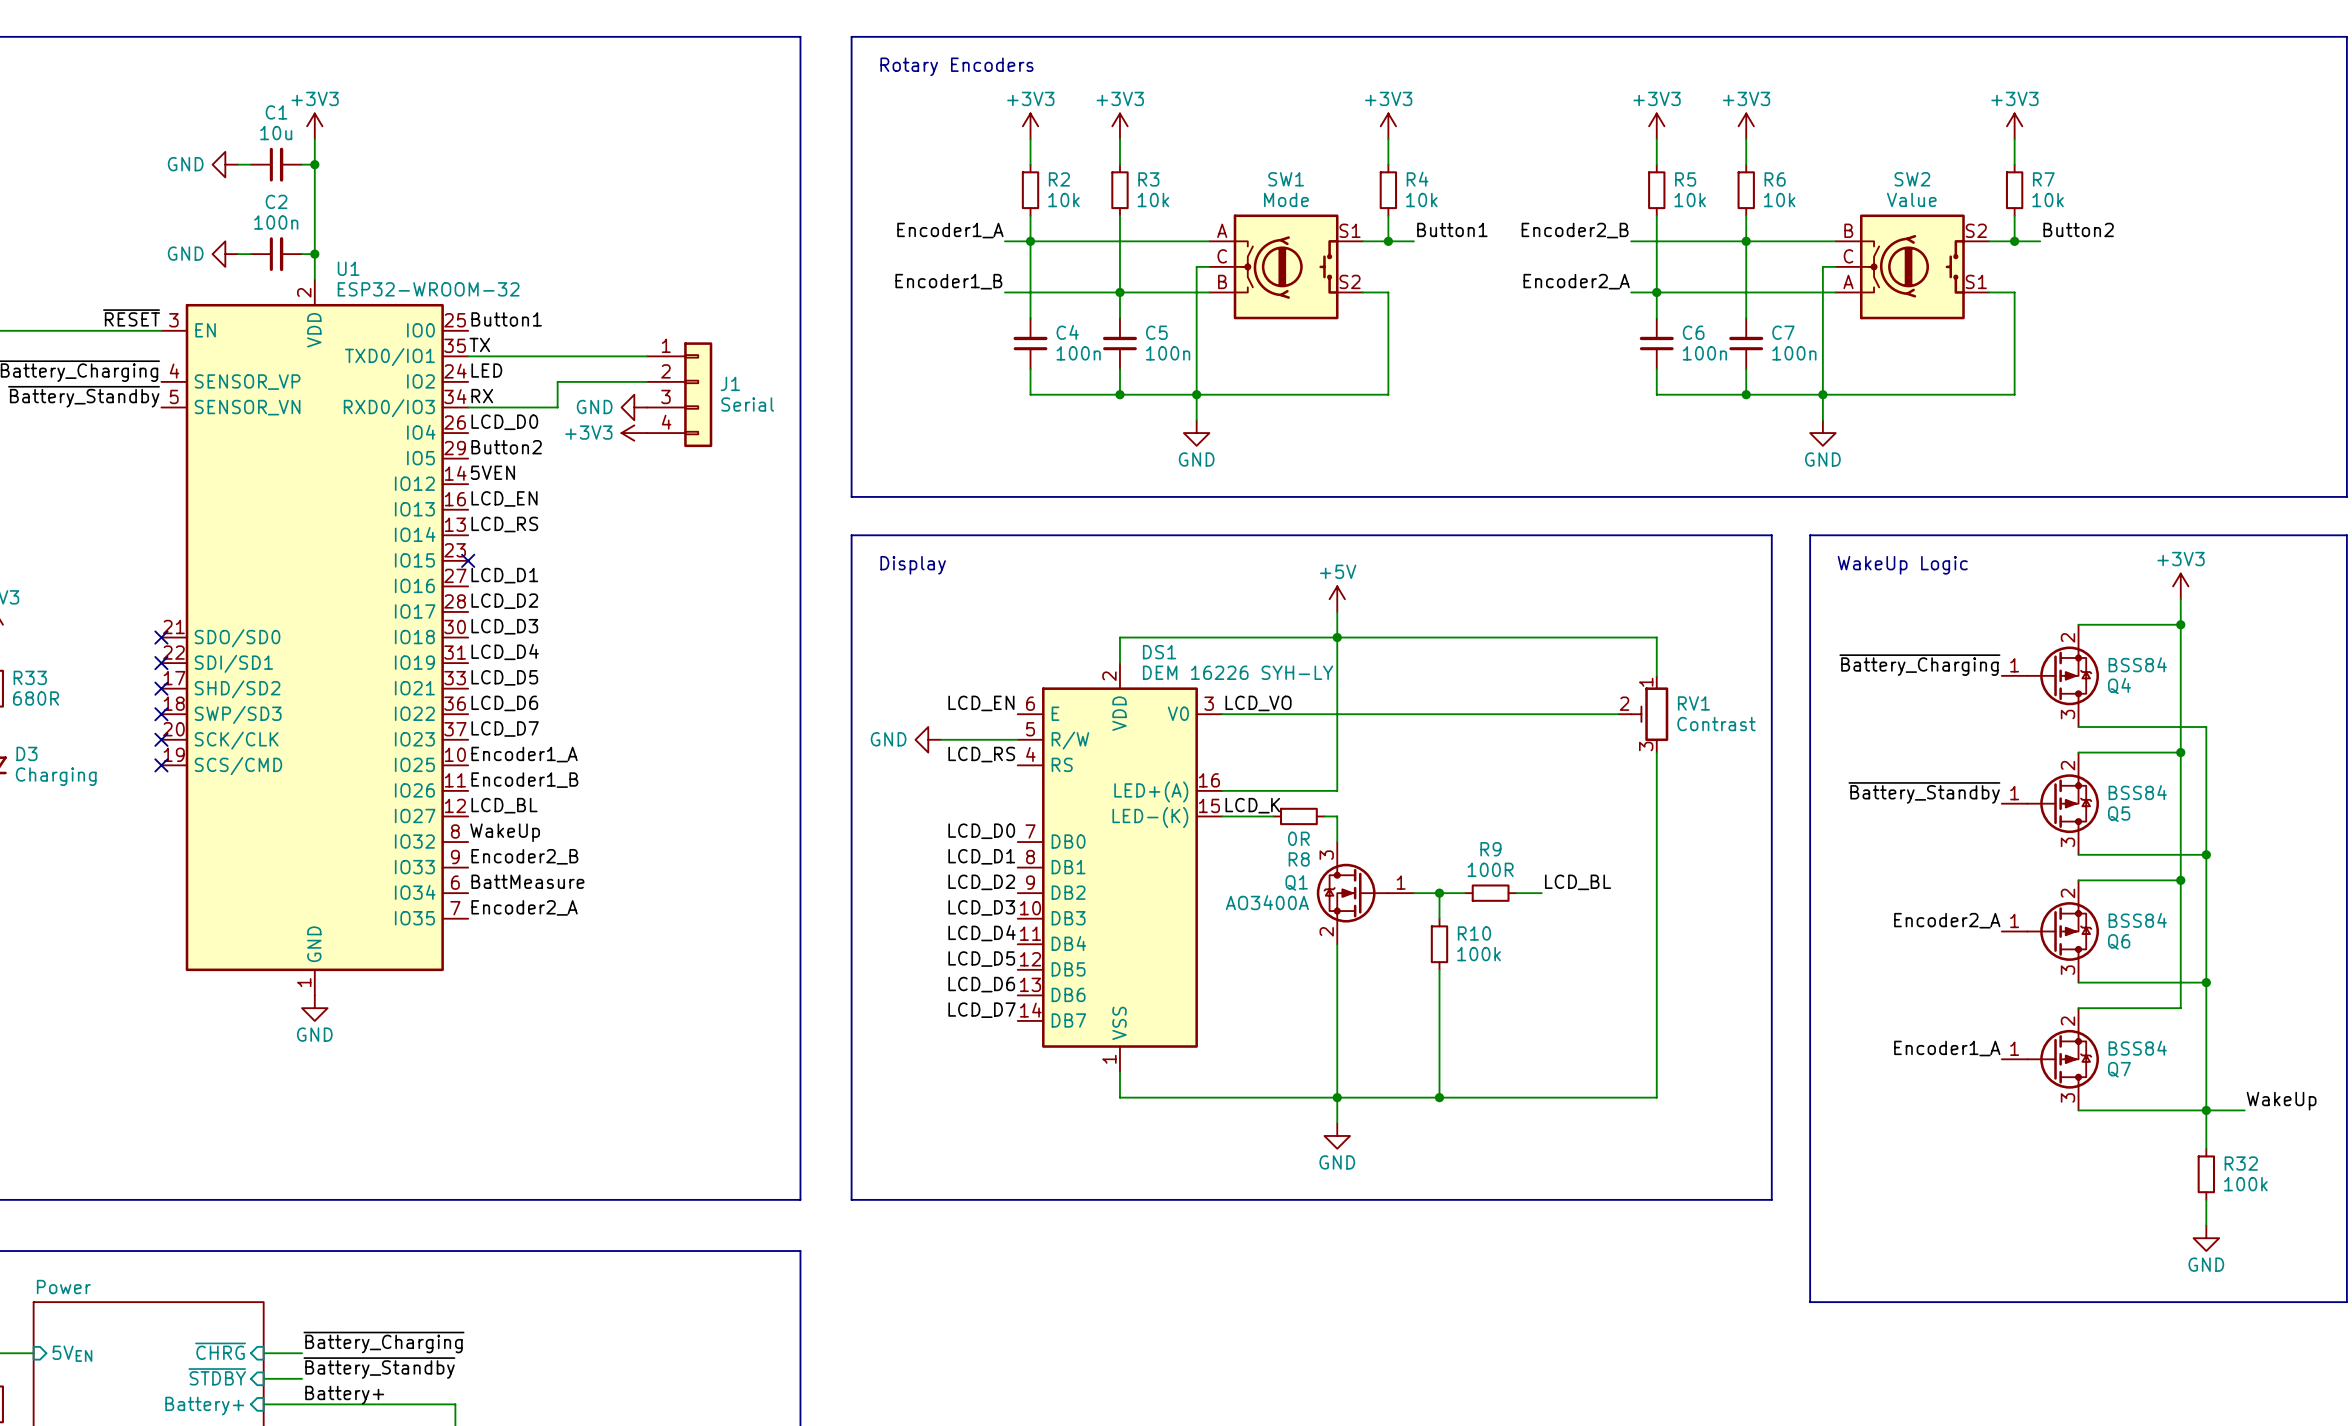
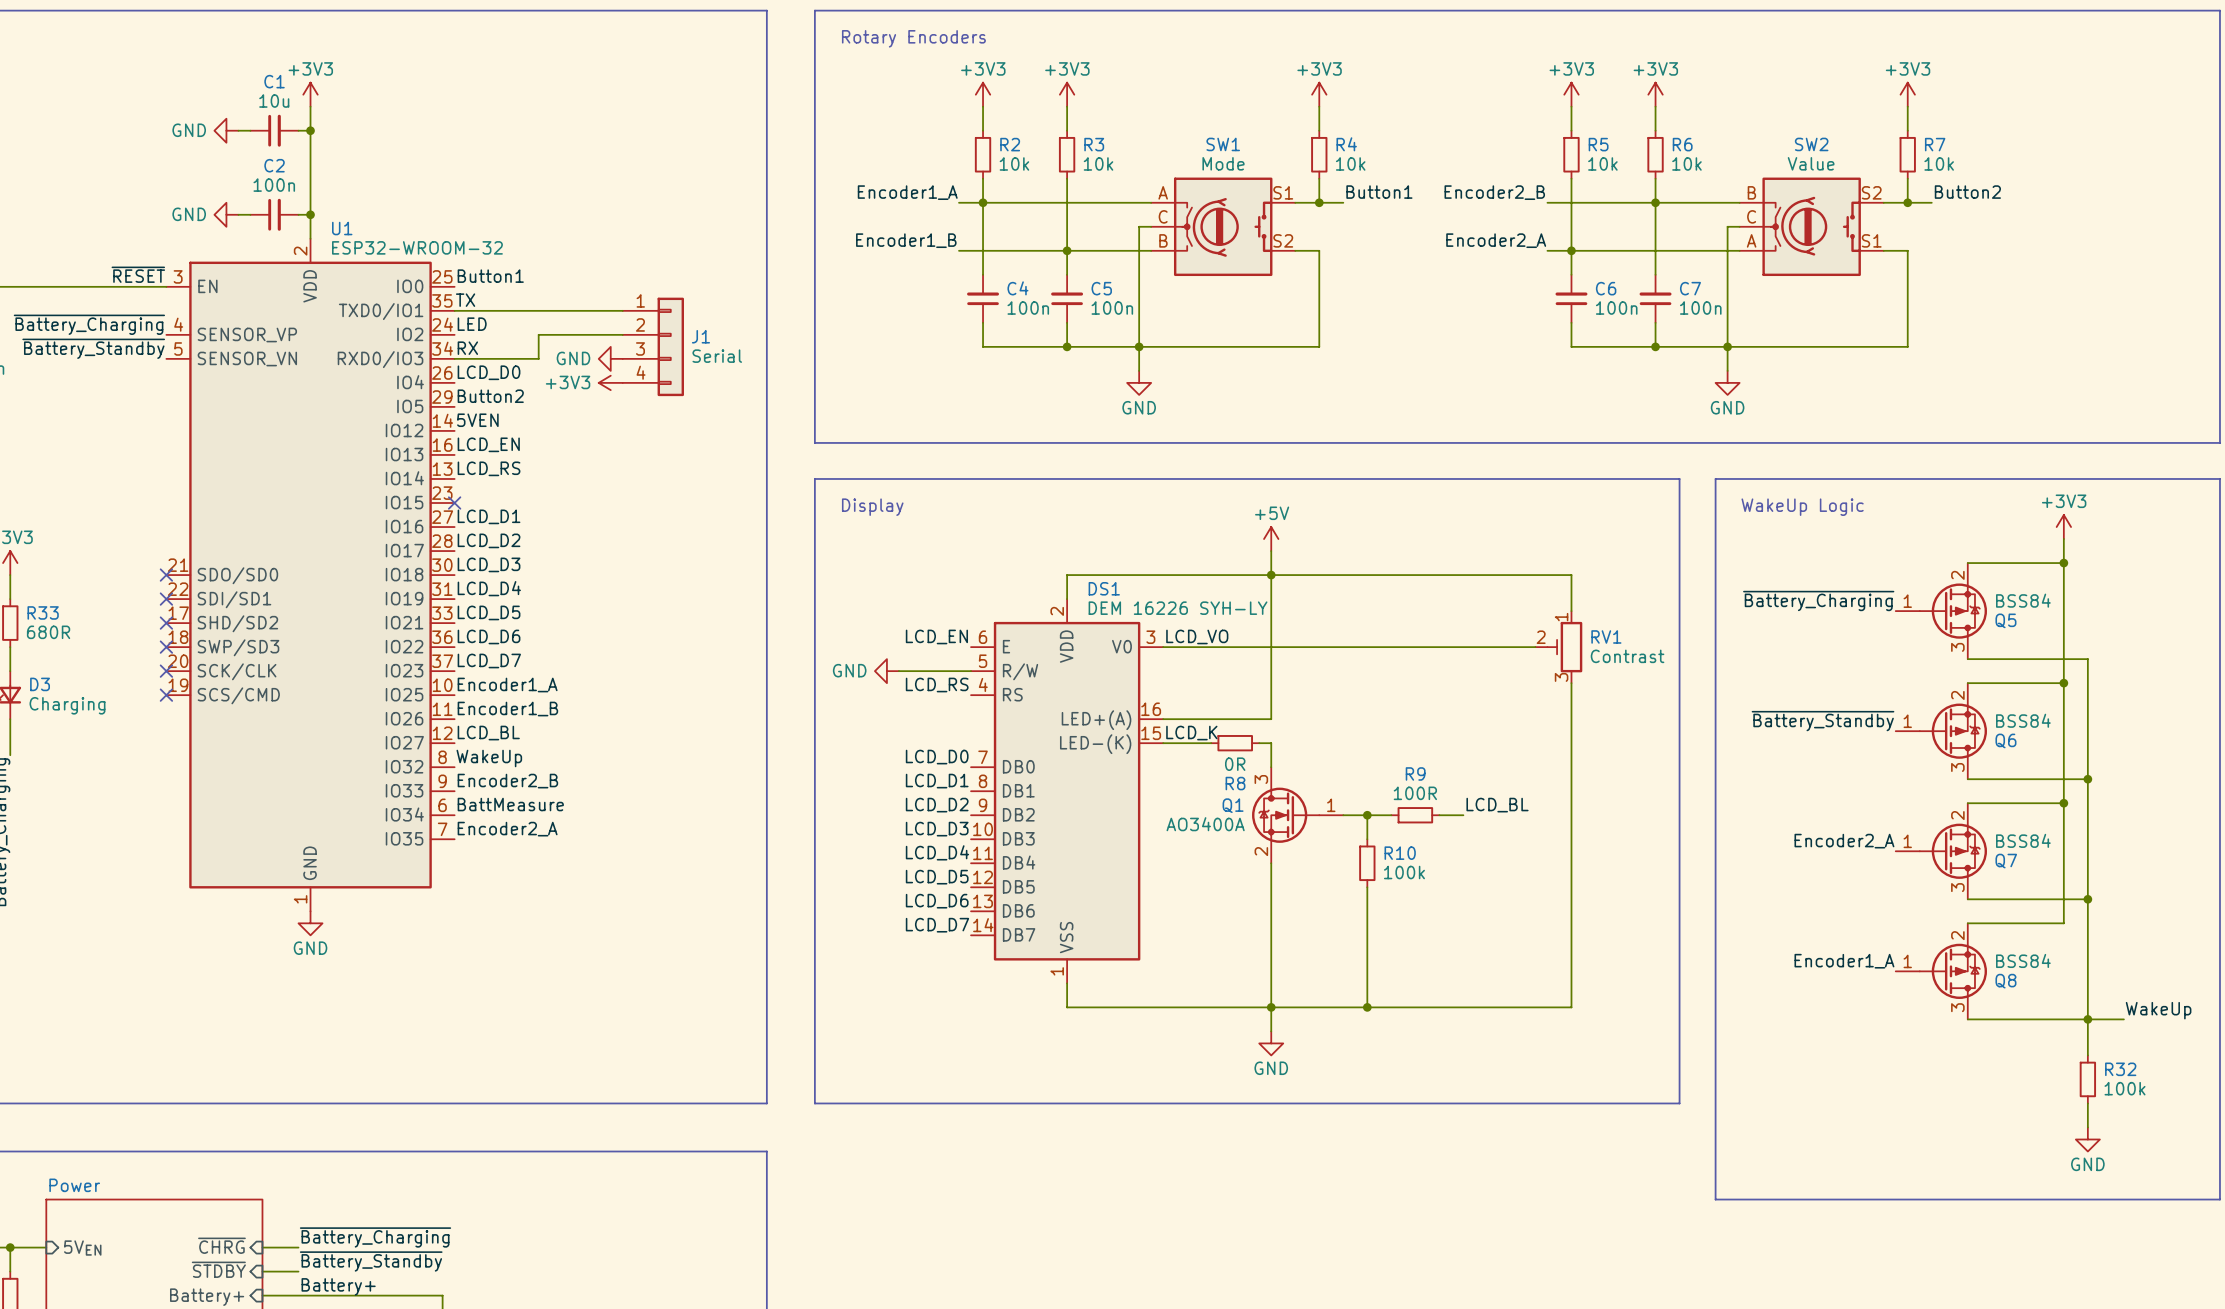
Q4 name: Q4 (2119, 686) -> Q5 (2005, 620)
Q5 name: Q5 (2119, 814) -> Q6 (2005, 740)
Q6 name: Q6 (2119, 941) -> Q7 (2006, 861)
Q7 name: Q7 (2119, 1069) -> Q8 (2005, 981)

